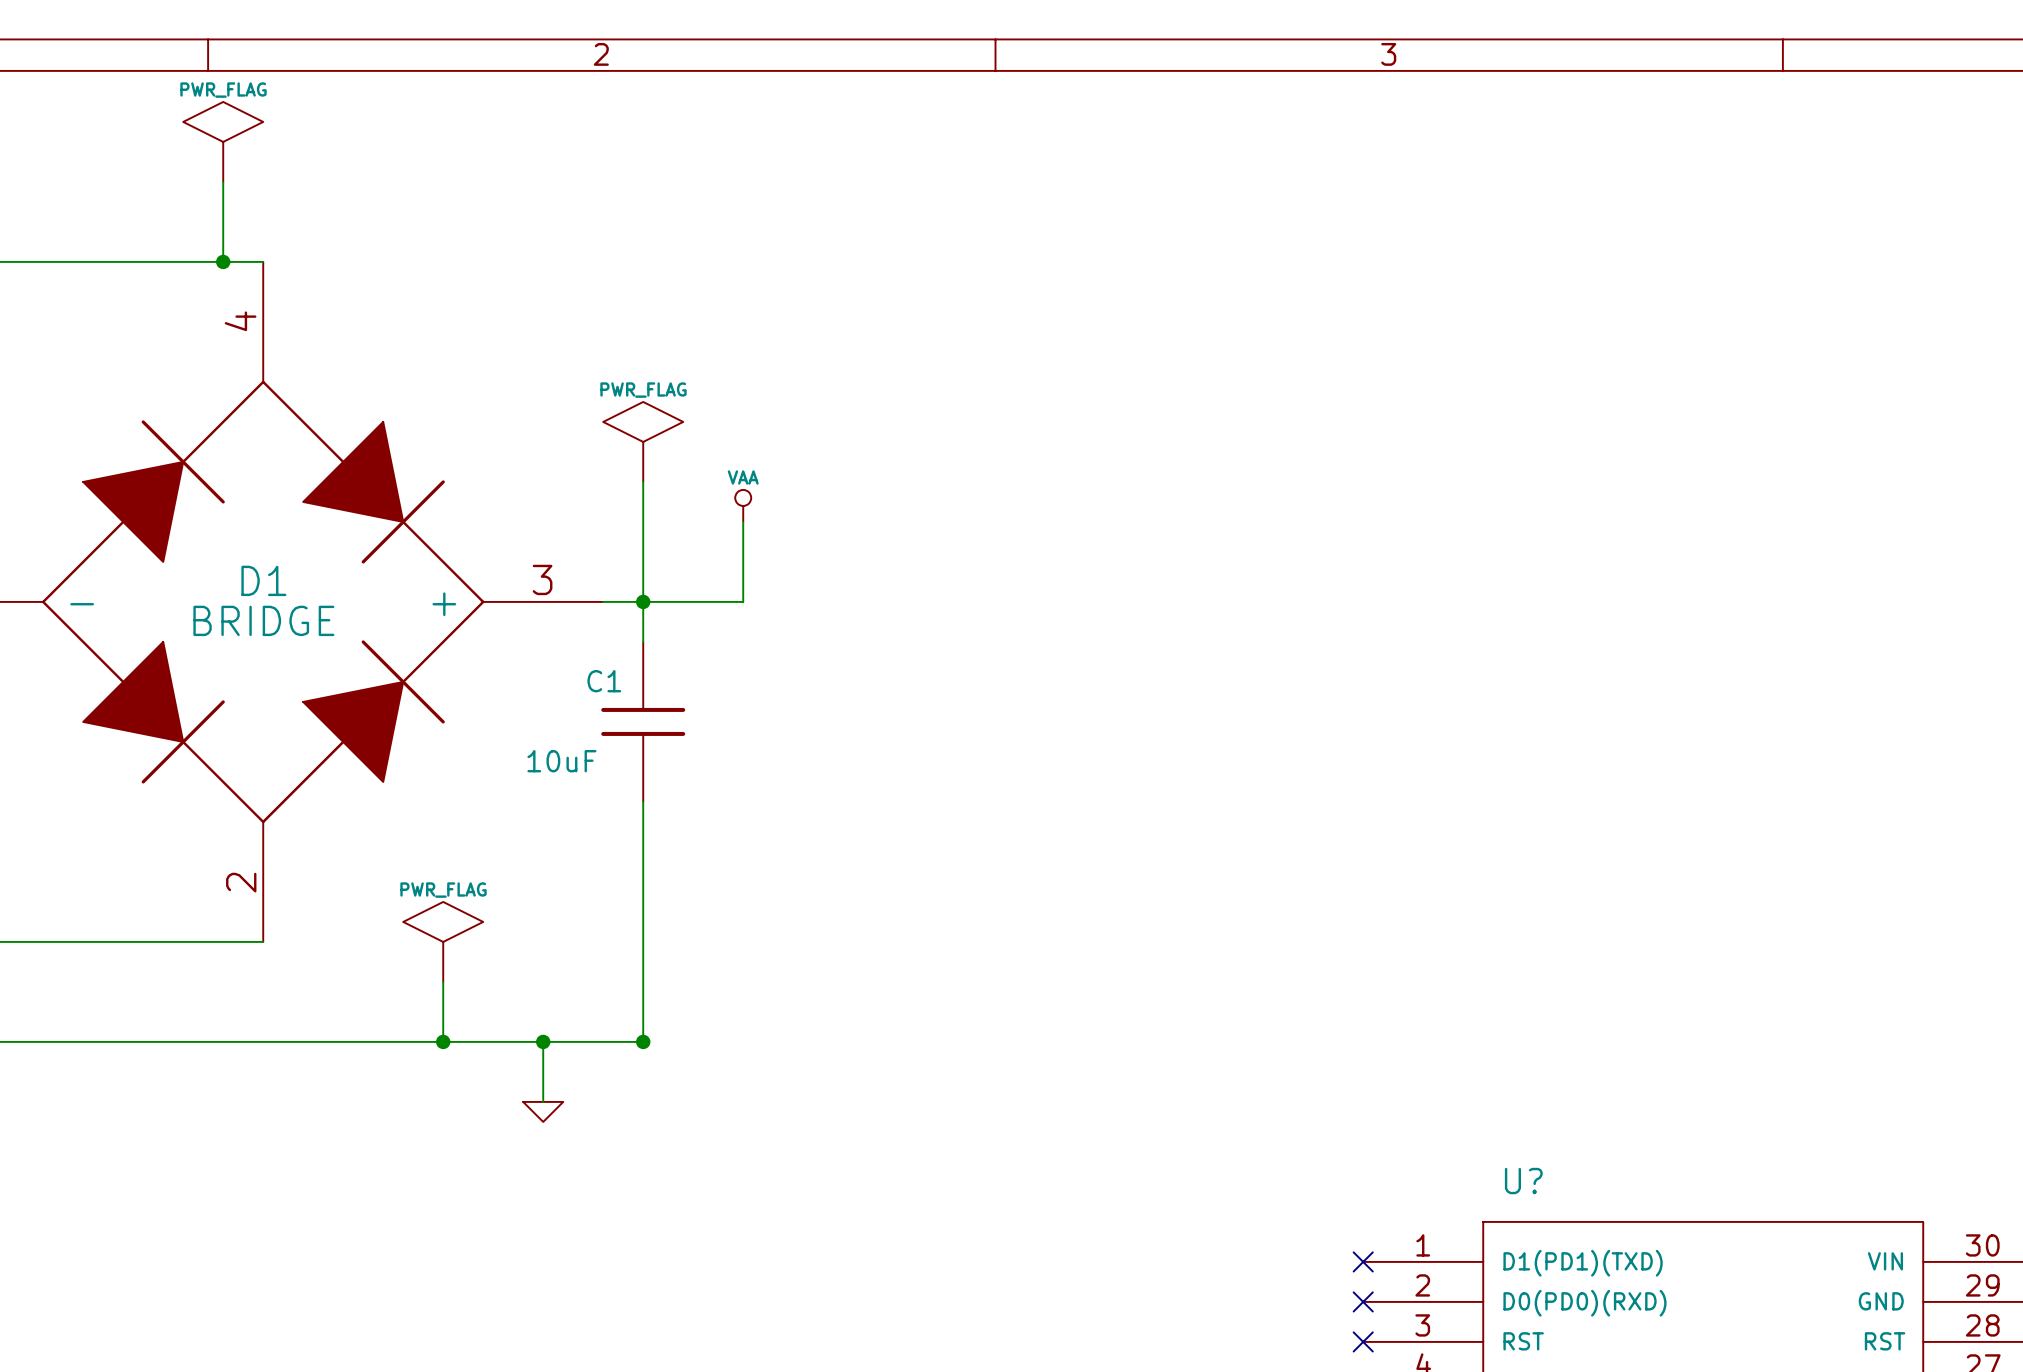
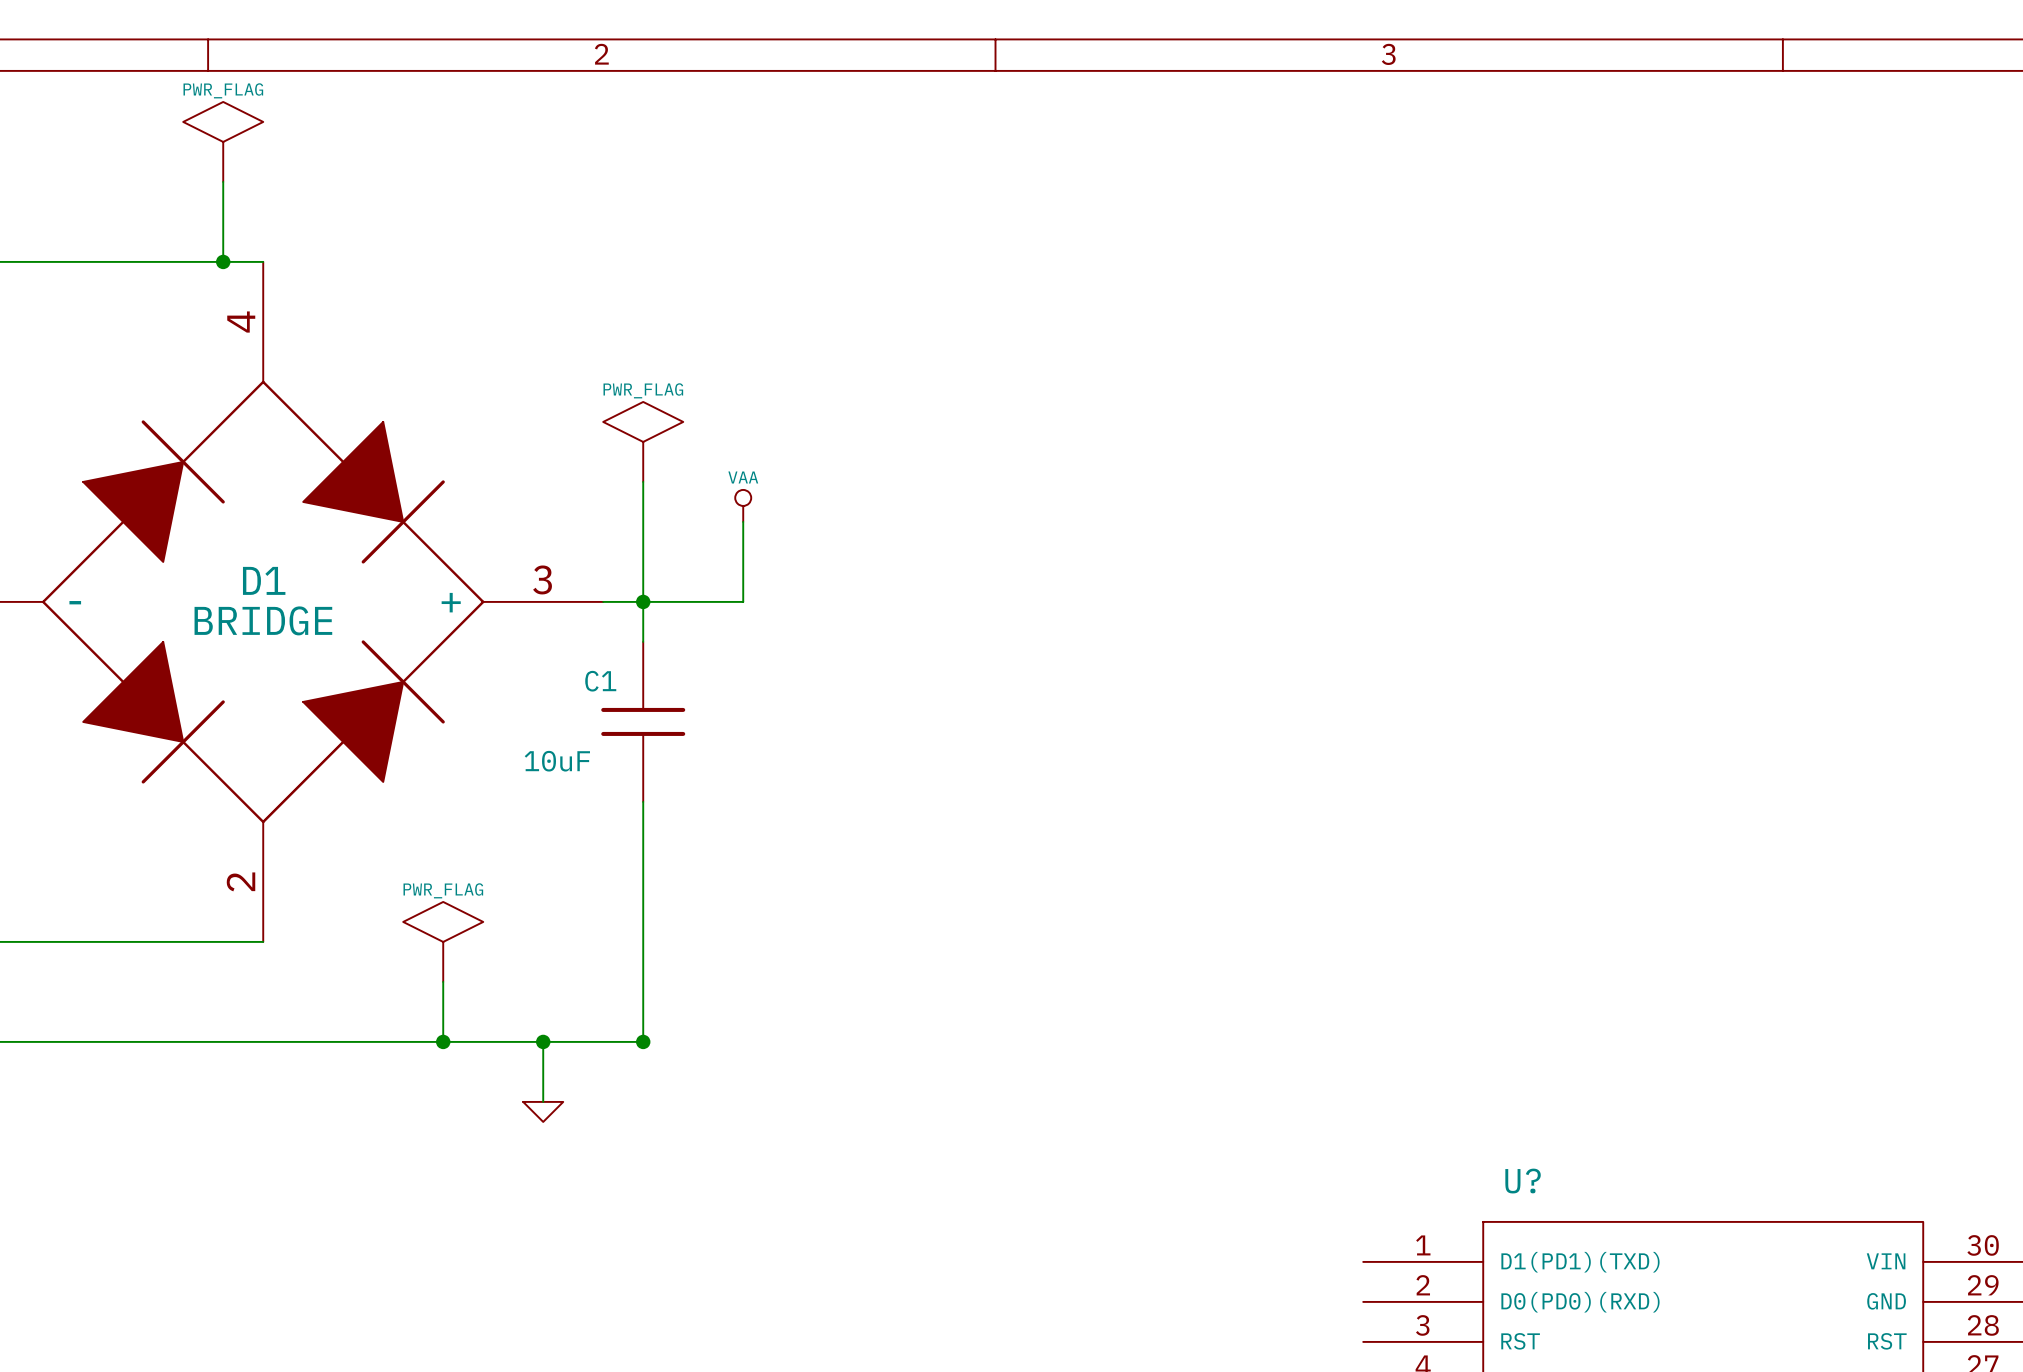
no-connect mark: (1363, 1261) -> none
no-connect mark: (1363, 1301) -> none
no-connect mark: (1363, 1341) -> none

